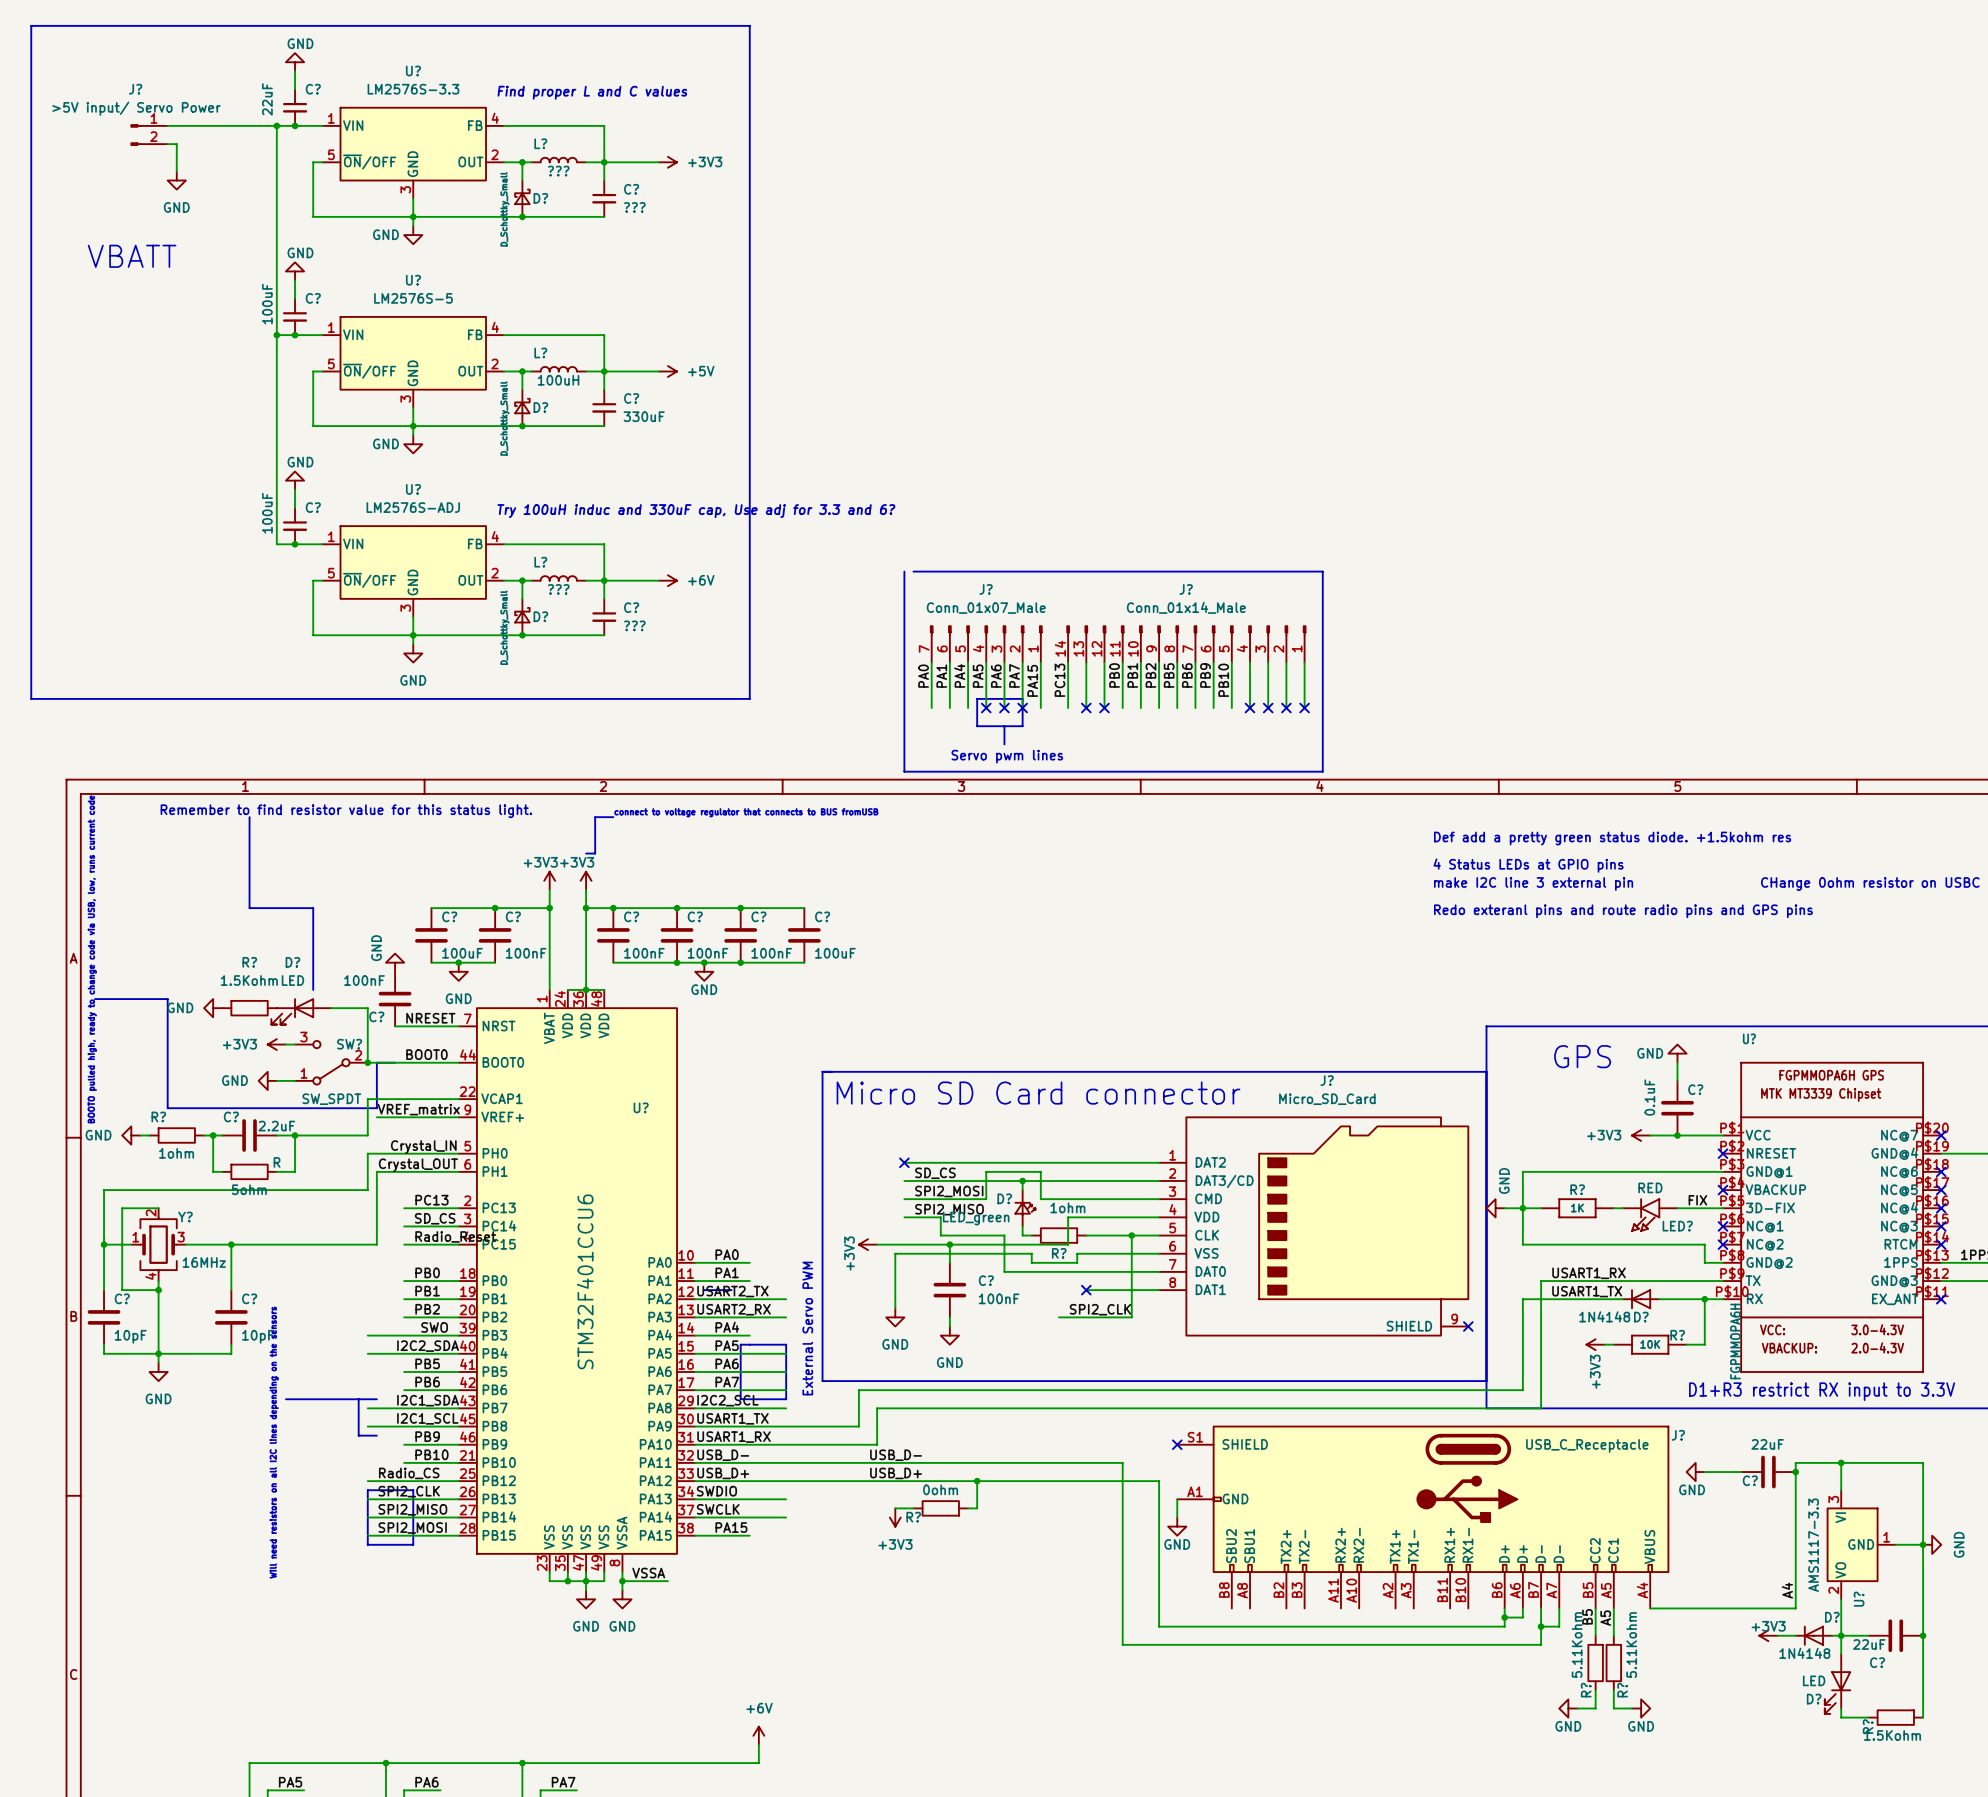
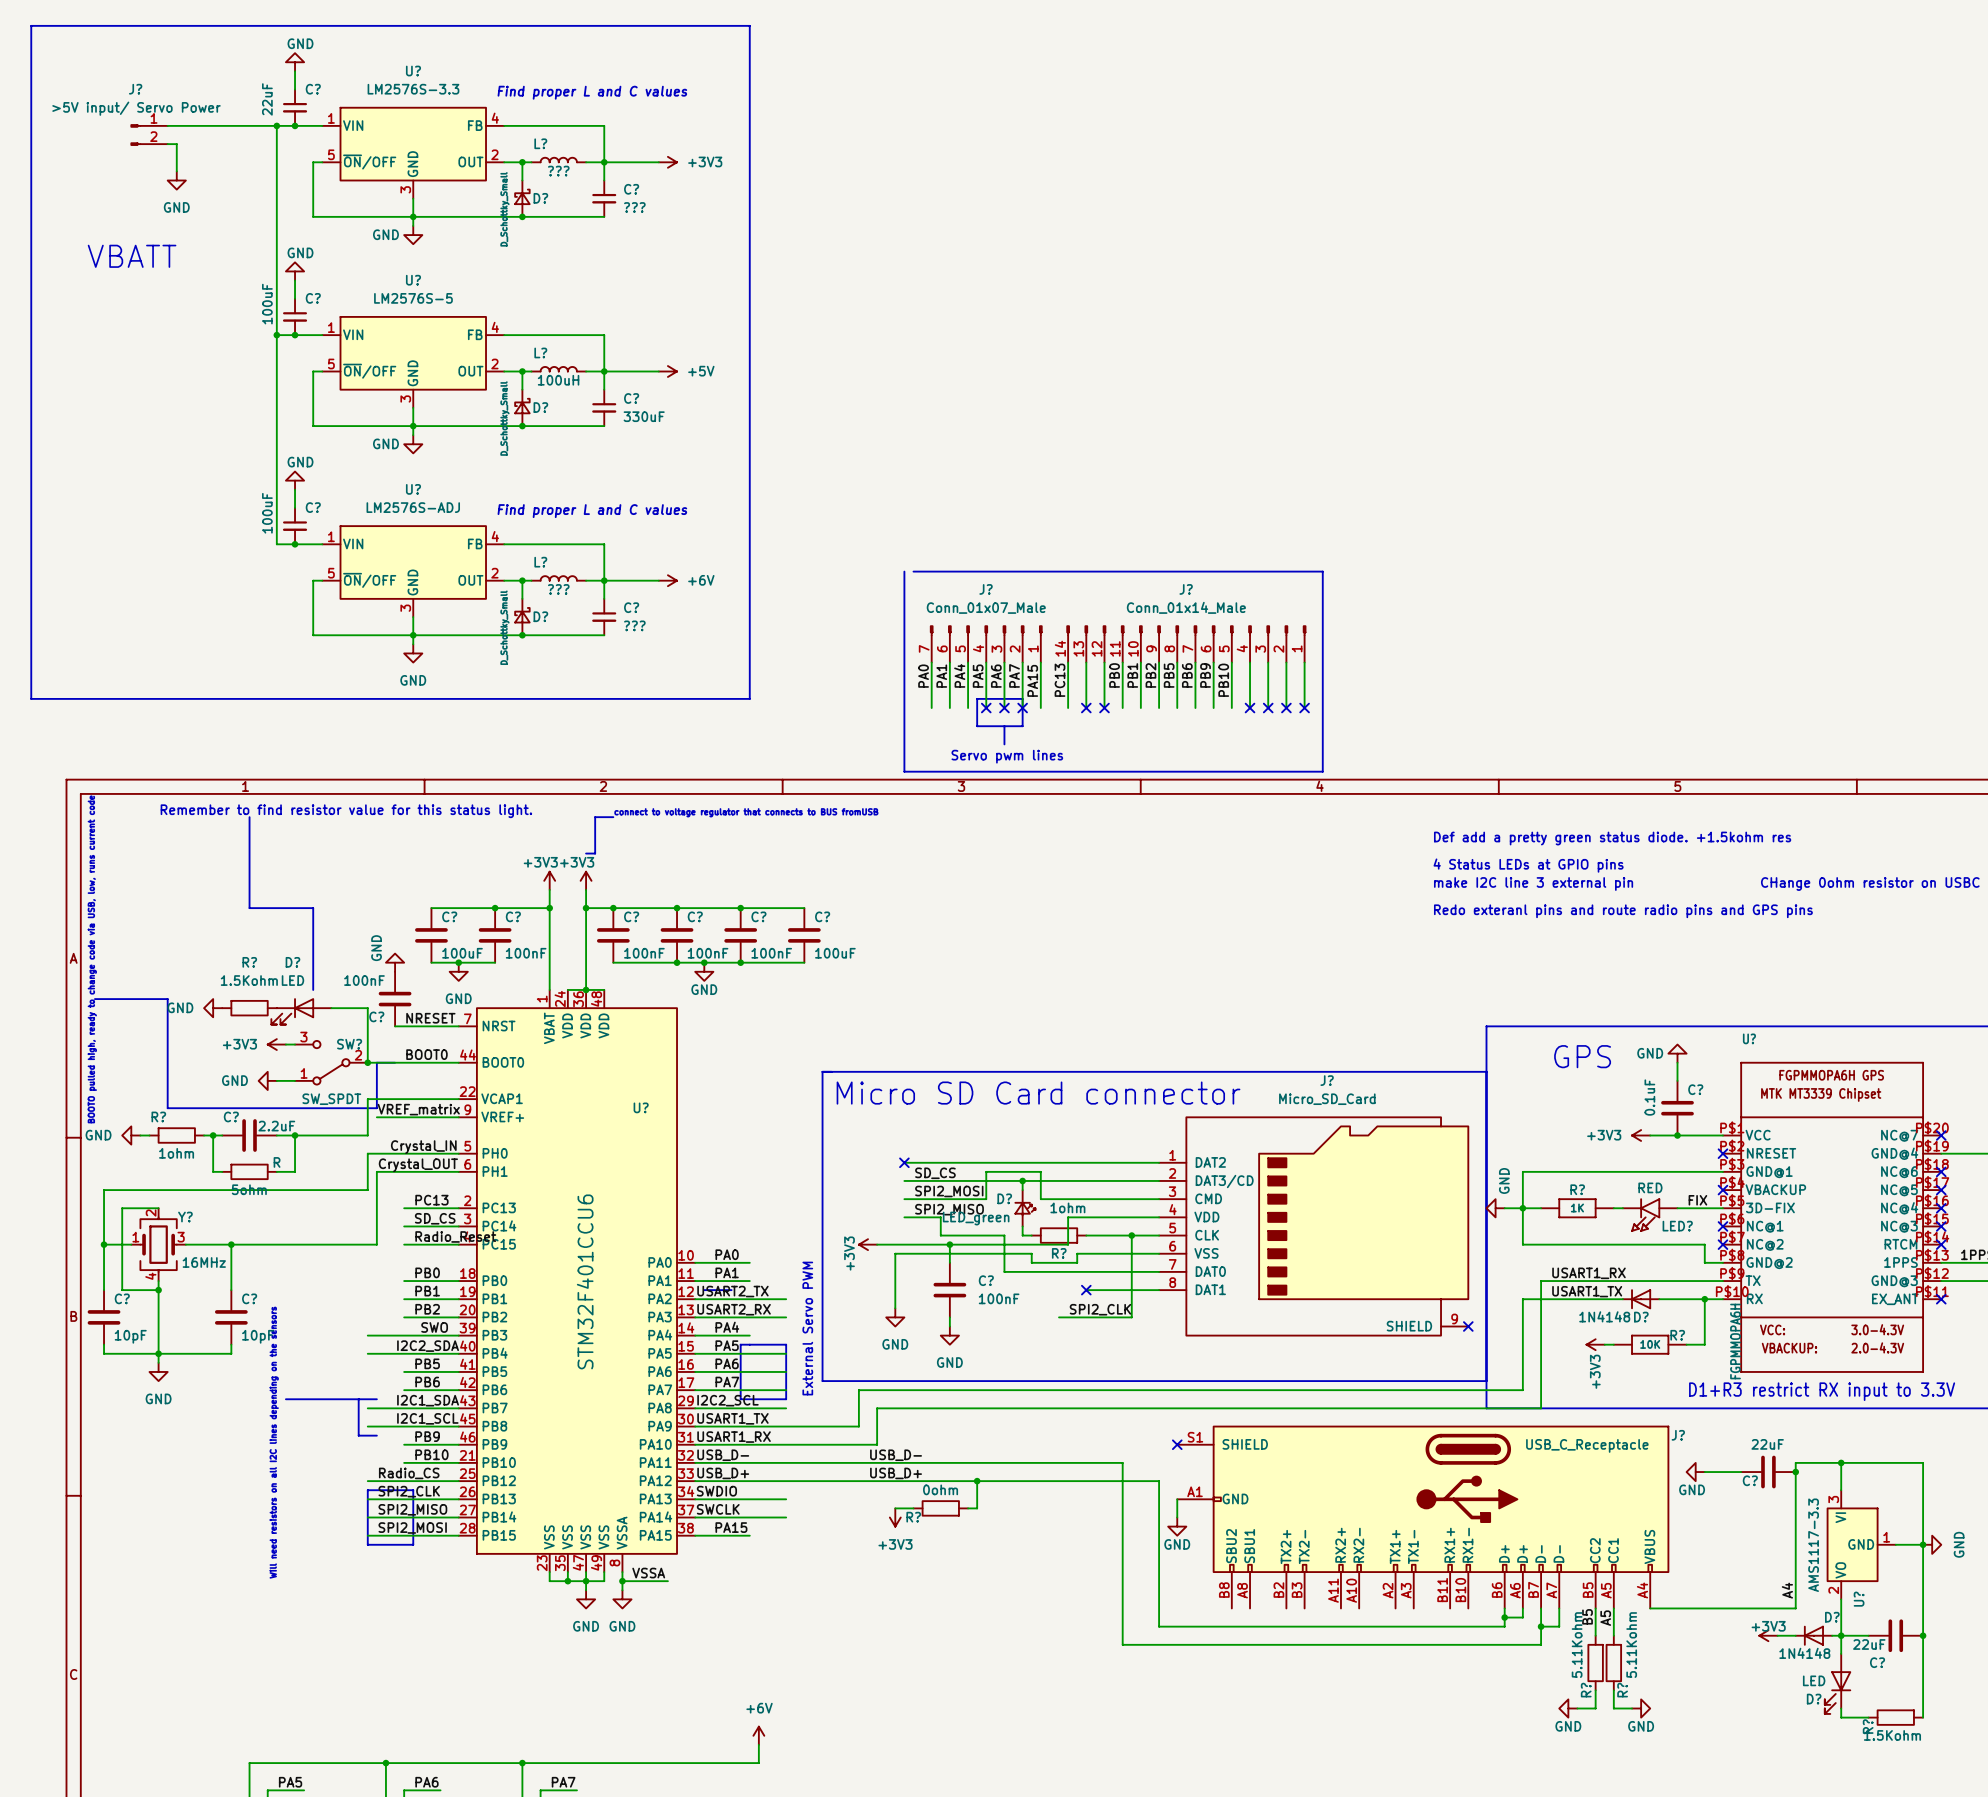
text: Try 100uH induc and 330uF cap, Use adj for 3.3 and 6? (696, 511) -> Find proper L and C values (592, 511)

